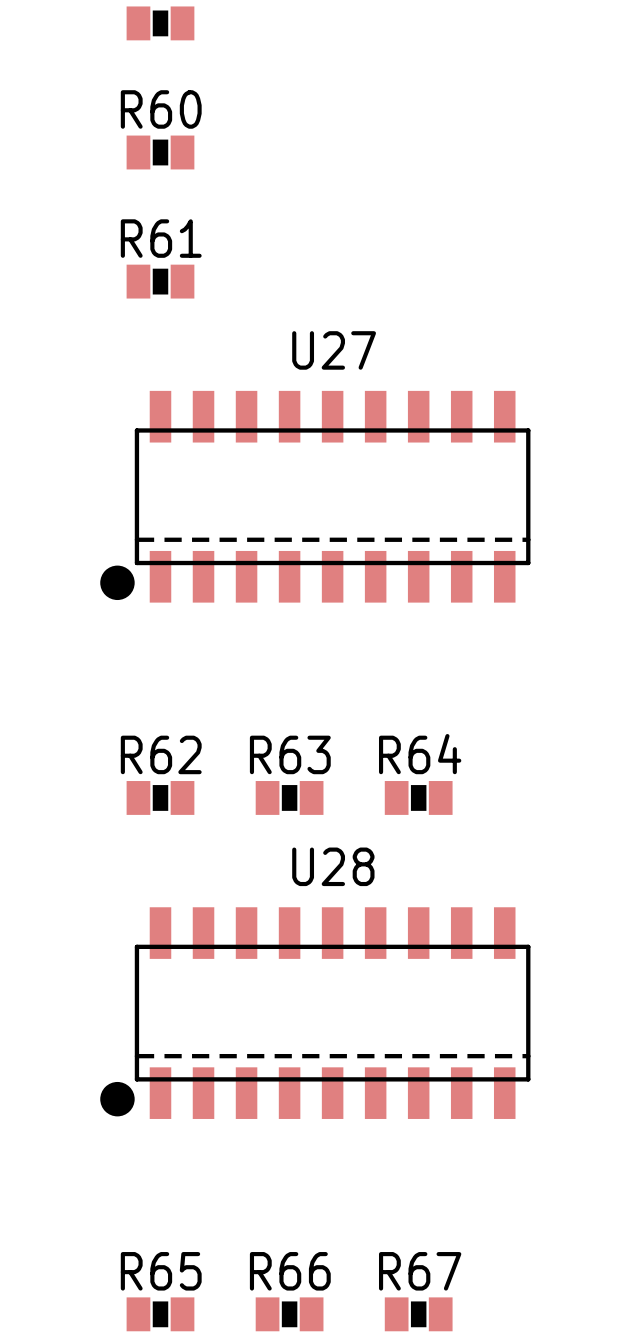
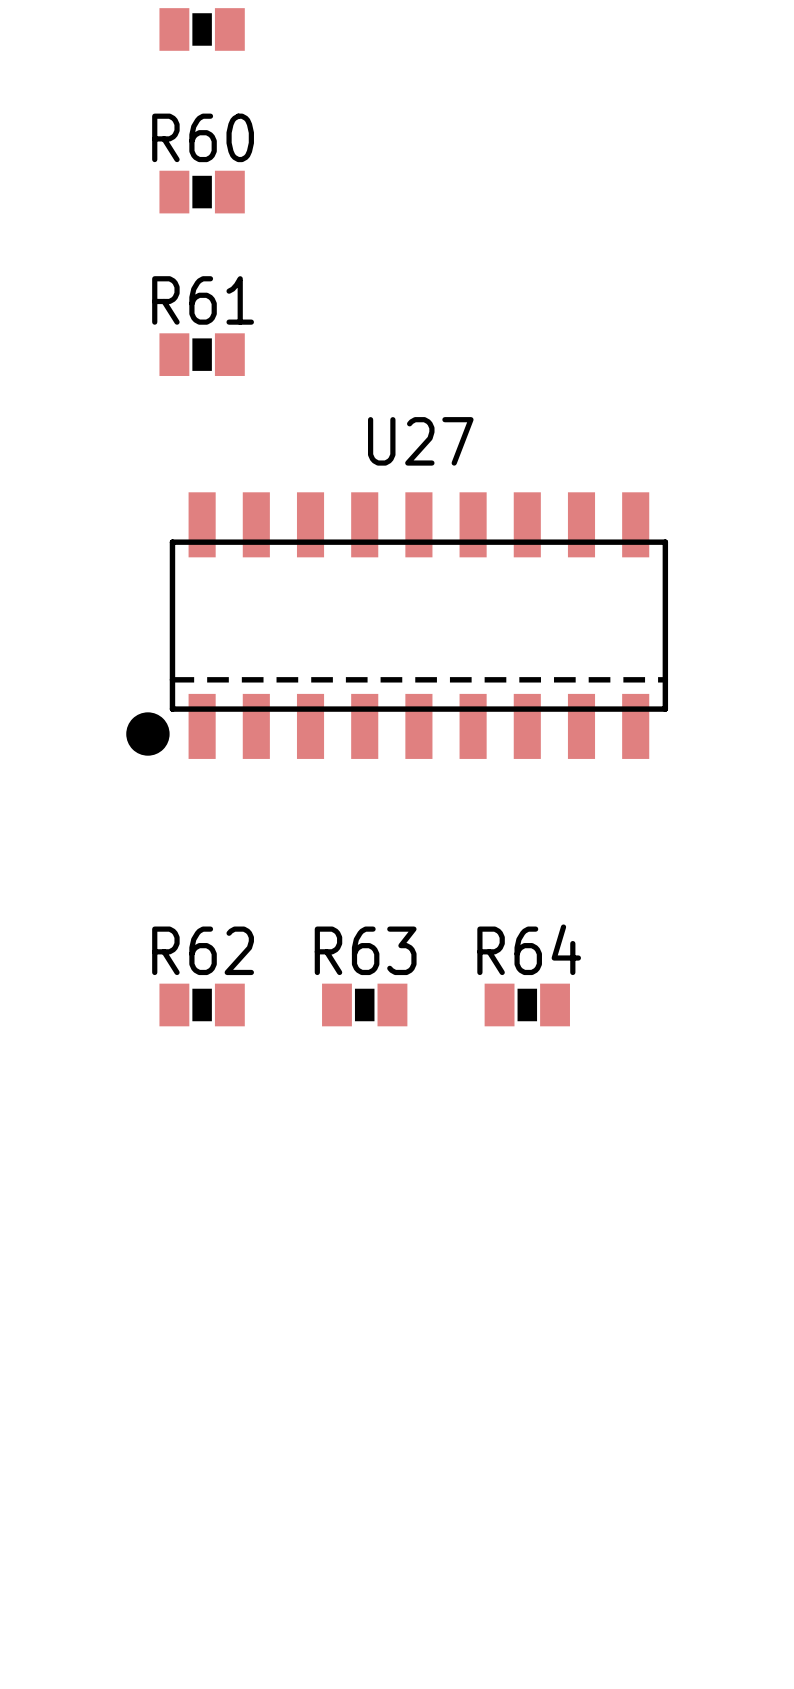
U28: (315, 1013) -> none
R65: (160, 1314) -> none
R66: (289, 1314) -> none
R67: (418, 1314) -> none

